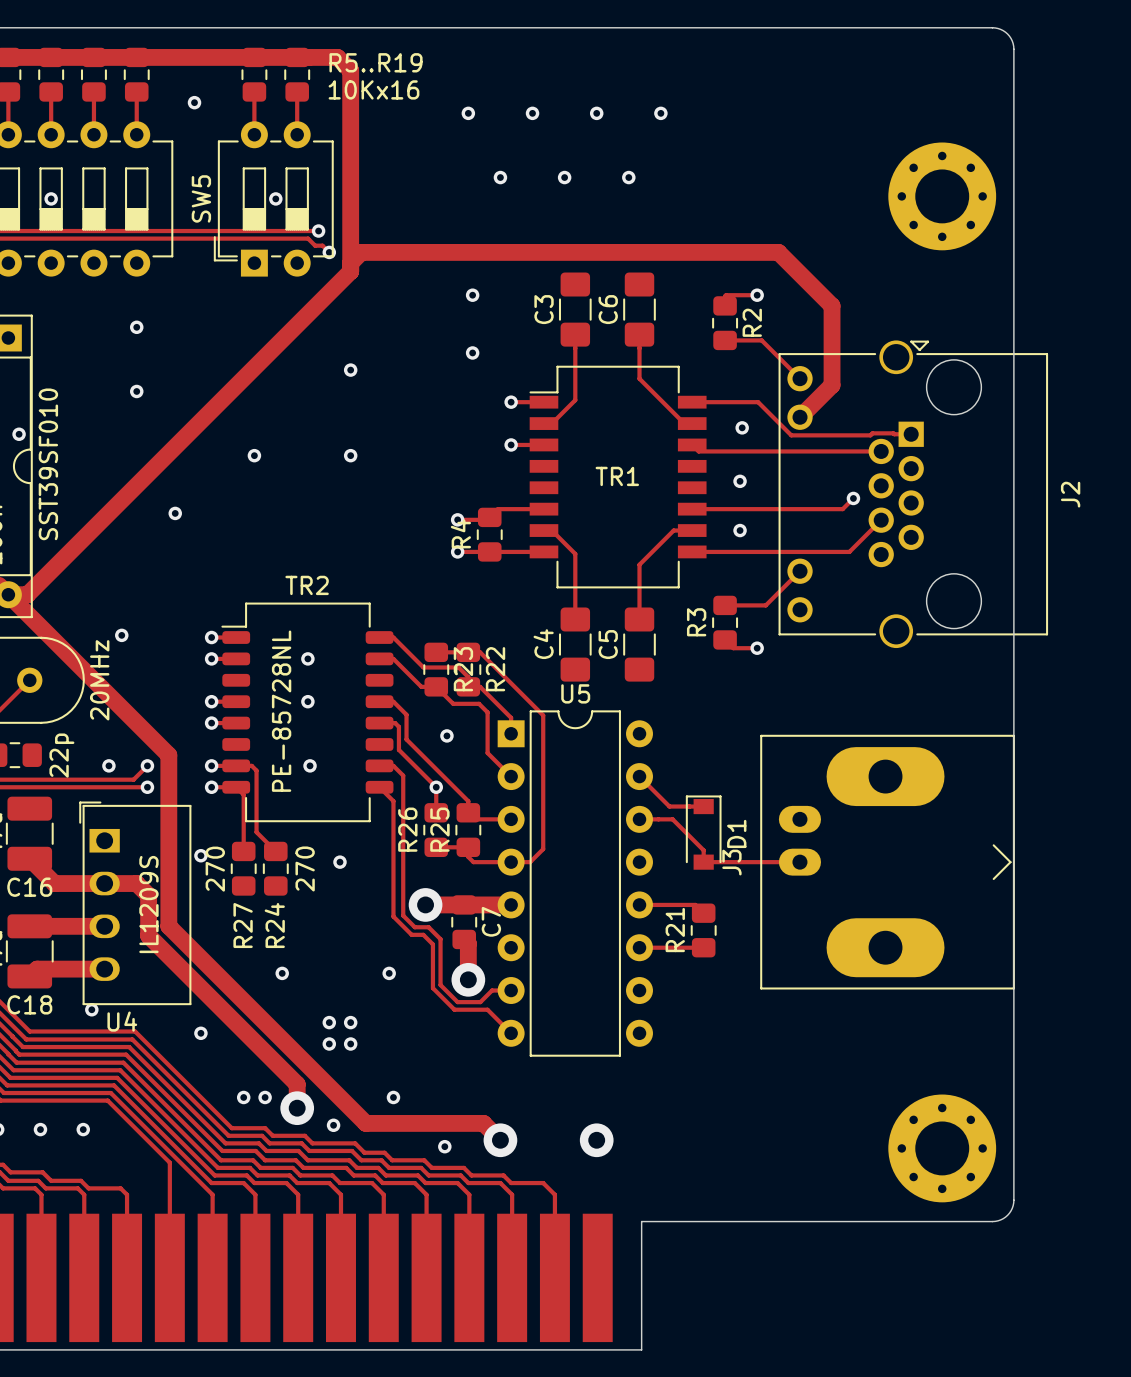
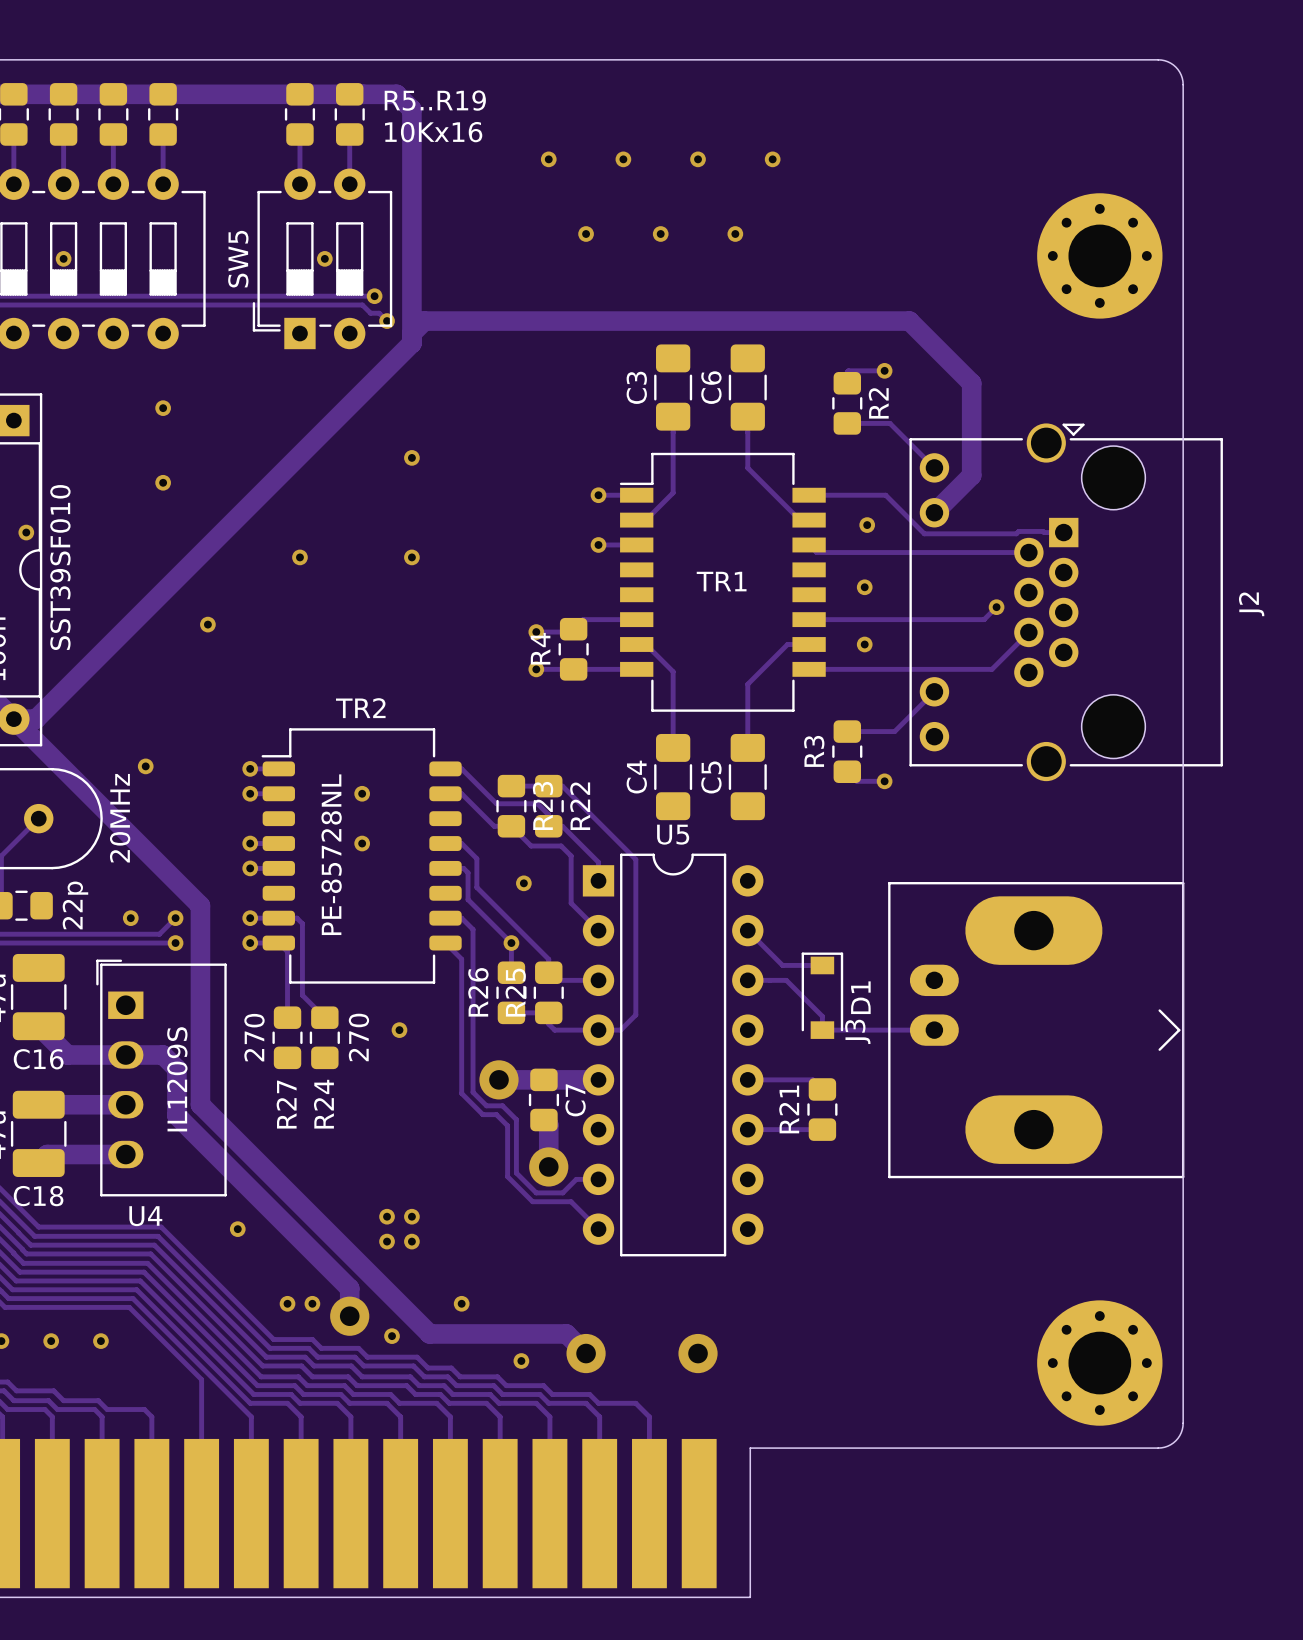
via: (194, 102) -> none
via: (472, 295) -> none
via: (472, 352) -> none
via: (310, 765) -> none
via: (200, 855) -> none
via: (282, 973) -> none
via: (389, 973) -> none
via: (91, 1009) -> none

